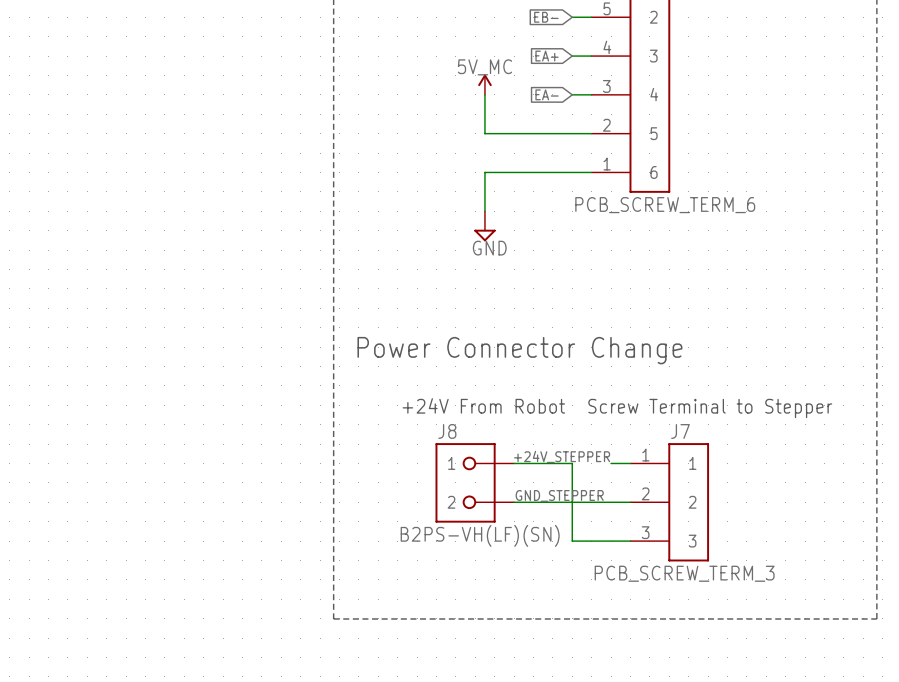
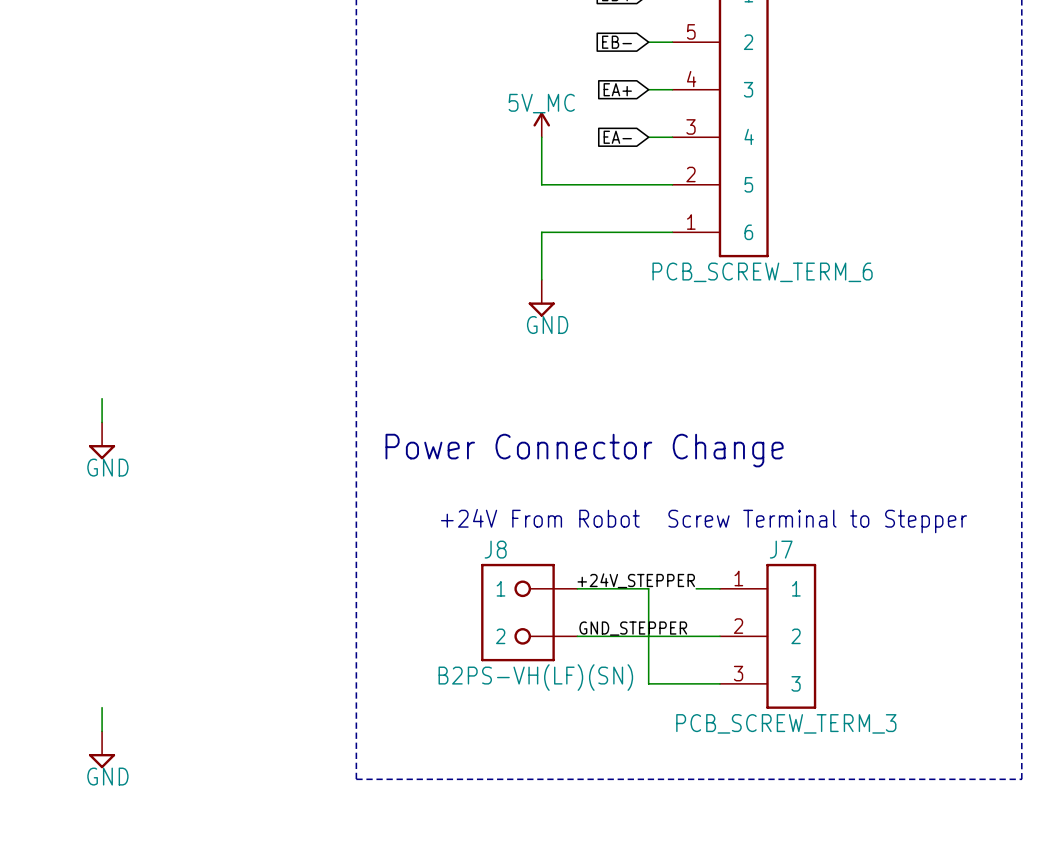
wire: none -> (102, 398) (102, 422)
power symbol: none -> GND (102, 440)
wire: none -> (102, 707) (102, 731)
power symbol: none -> GND (102, 749)

